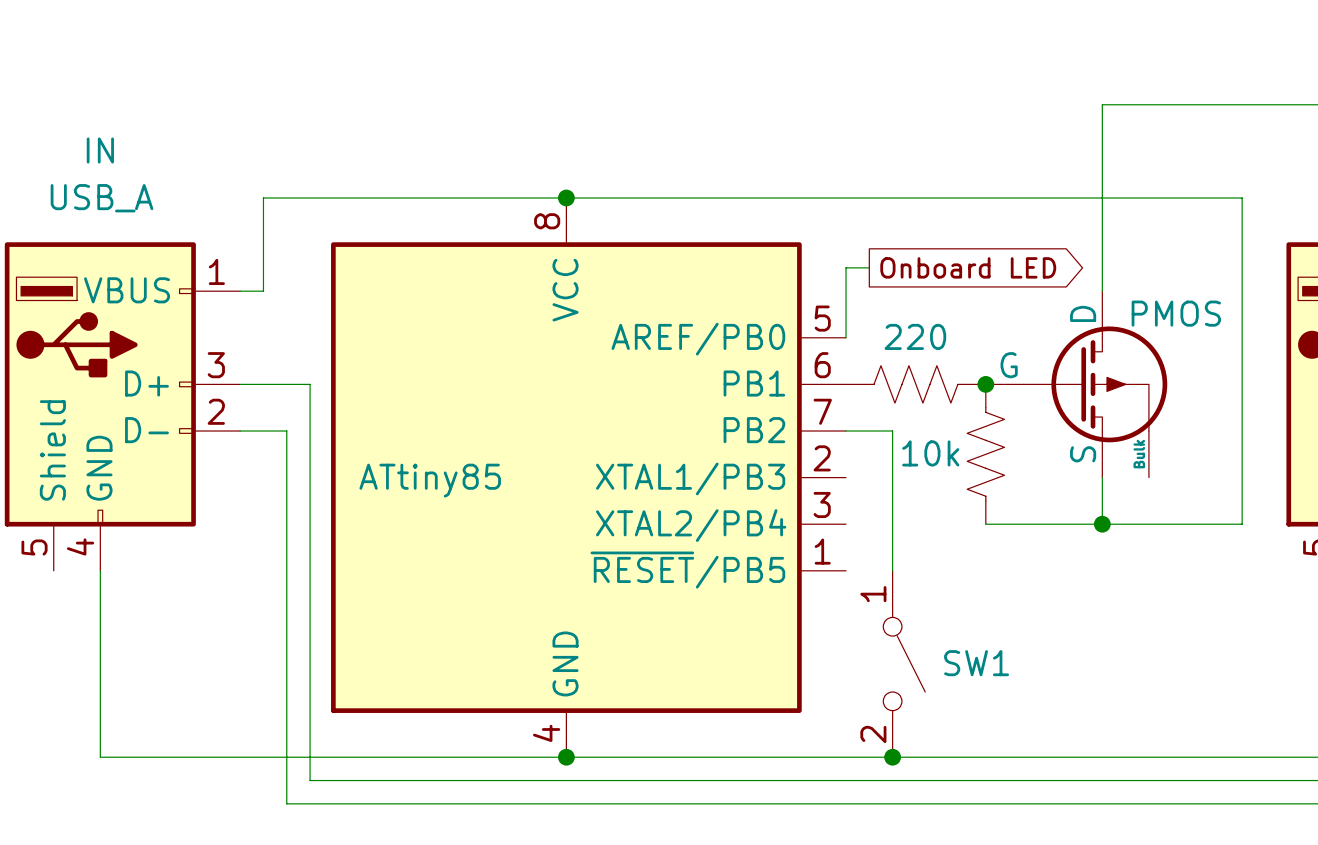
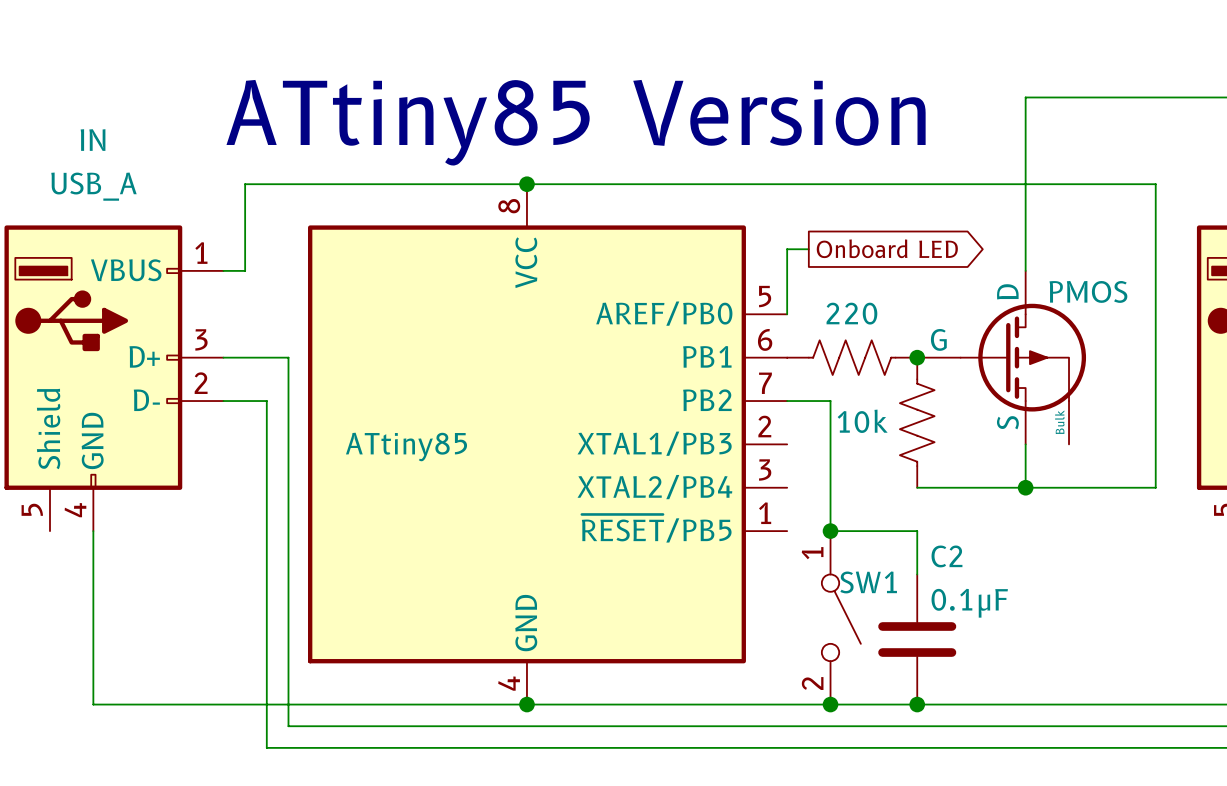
text: none -> ATtiny85 Version (576, 122)
wire: none -> (830, 531) (917, 531) (917, 574)
junction: none -> (830, 531)
SW1 name position: SW1 (976, 663) -> SW1 (868, 582)
C2: none -> 0.1μF (917, 639)
junction: none -> (917, 704)

